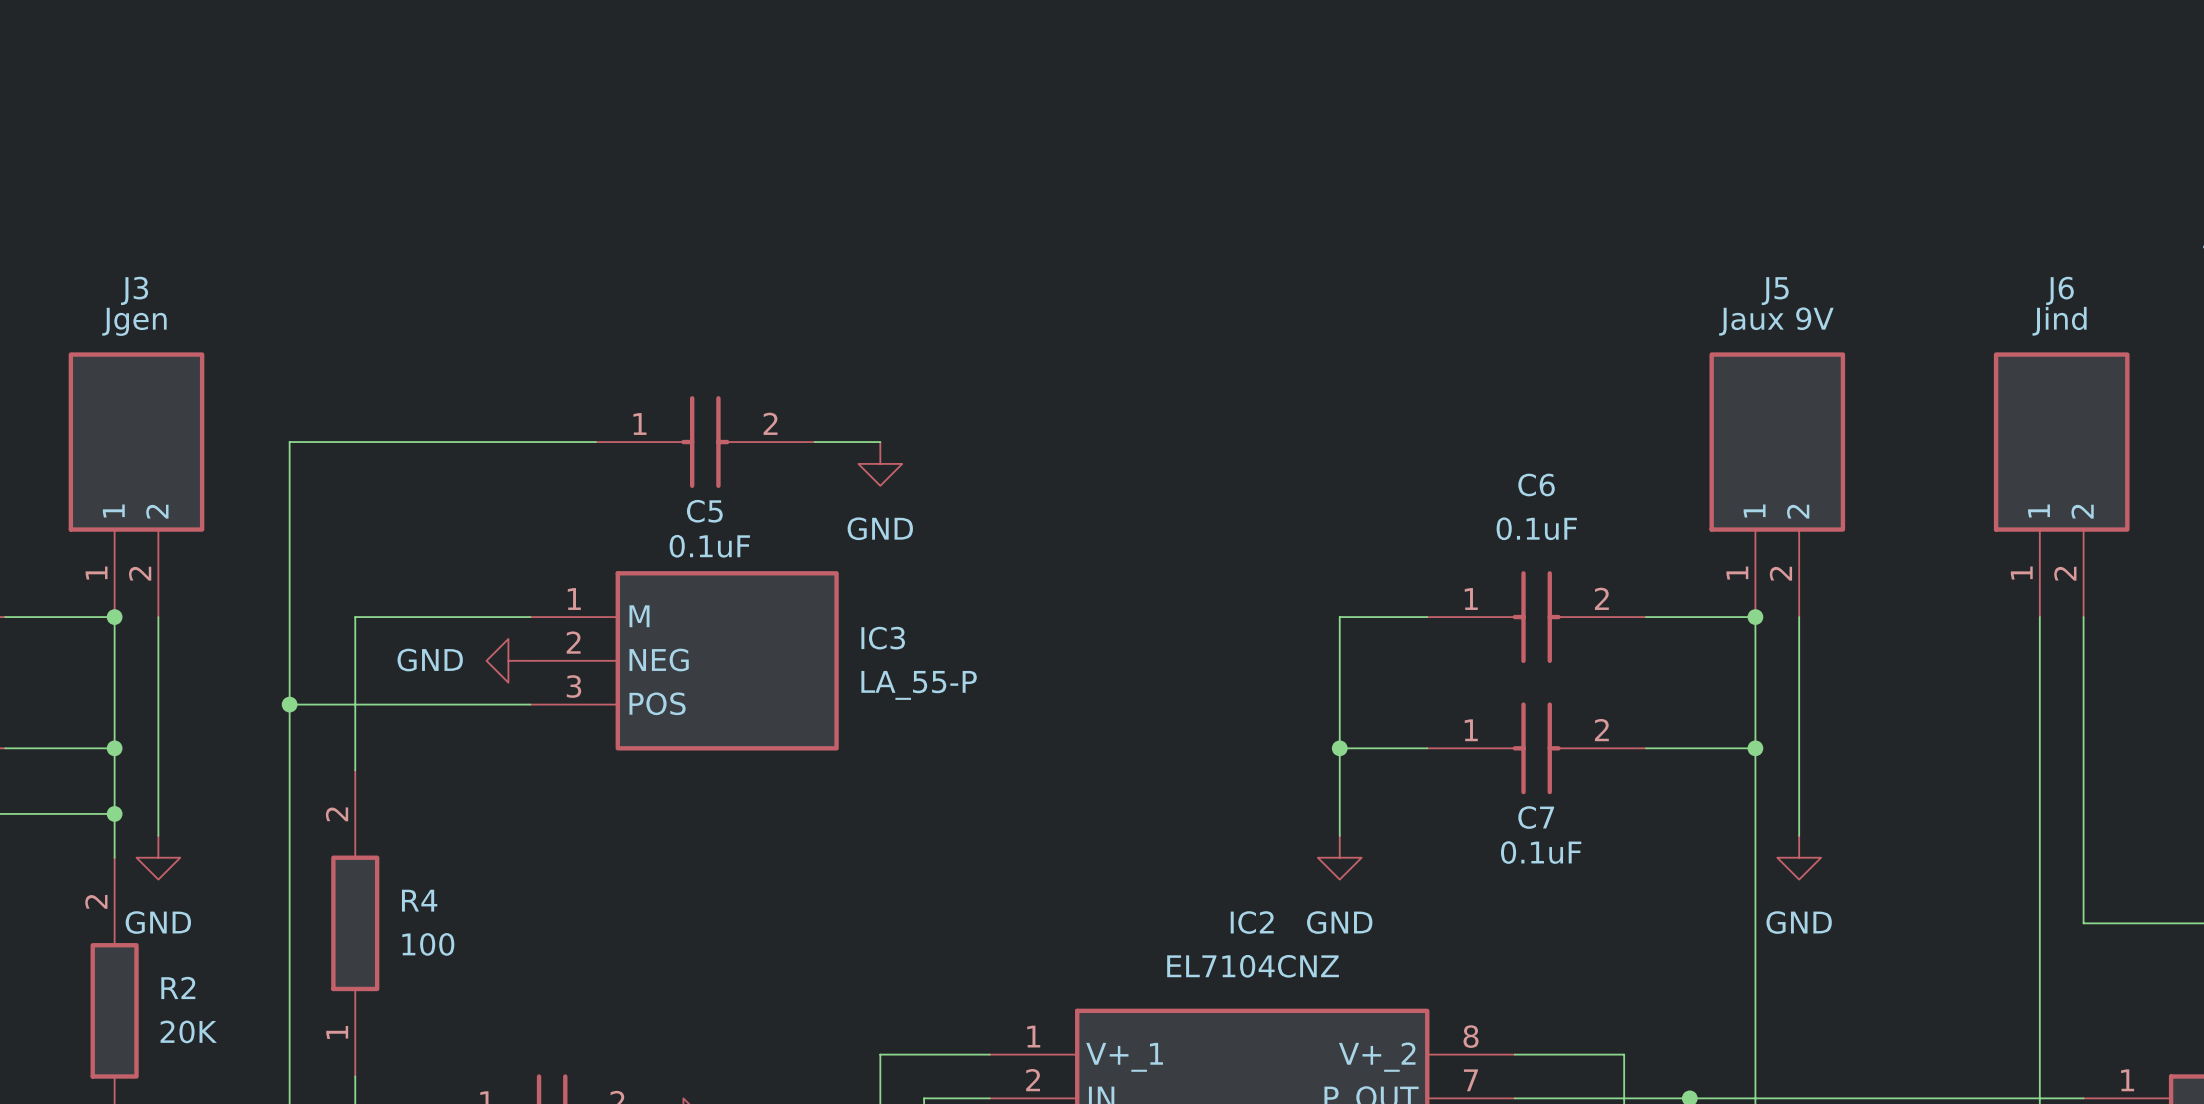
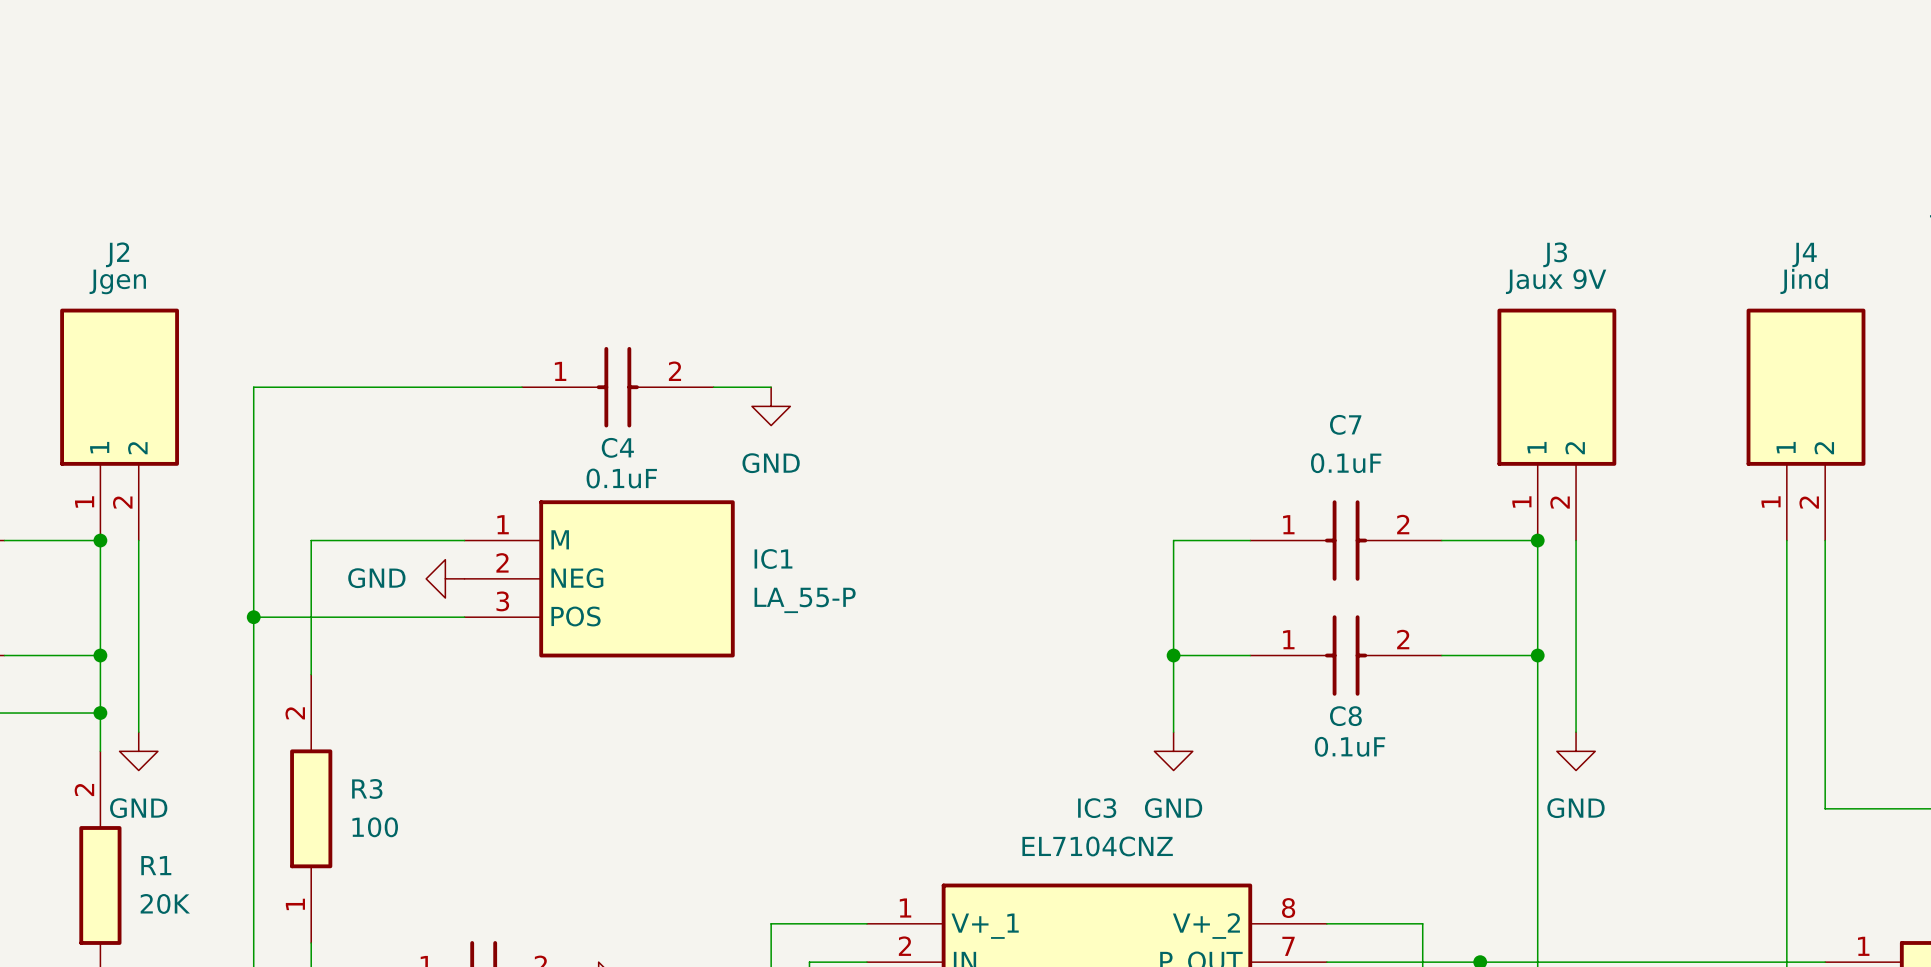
J3 name: J3 (134, 290) -> J2 (117, 254)
J6 name: J6 (2059, 290) -> J4 (1804, 254)
J5 name: J5 (1775, 291) -> J3 (1555, 254)
C6 name: C6 (1536, 485) -> C7 (1345, 424)
C5 name: C5 (704, 511) -> C4 (617, 447)
IC3 name: IC3 (883, 638) -> IC1 (773, 558)
C7 name: C7 (1536, 817) -> C8 (1345, 716)
R4 name: R4 (419, 900) -> R3 (367, 788)
IC2 name: IC2 (1252, 922) -> IC3 (1097, 808)
R2 name: R2 (178, 987) -> R1 (156, 865)

